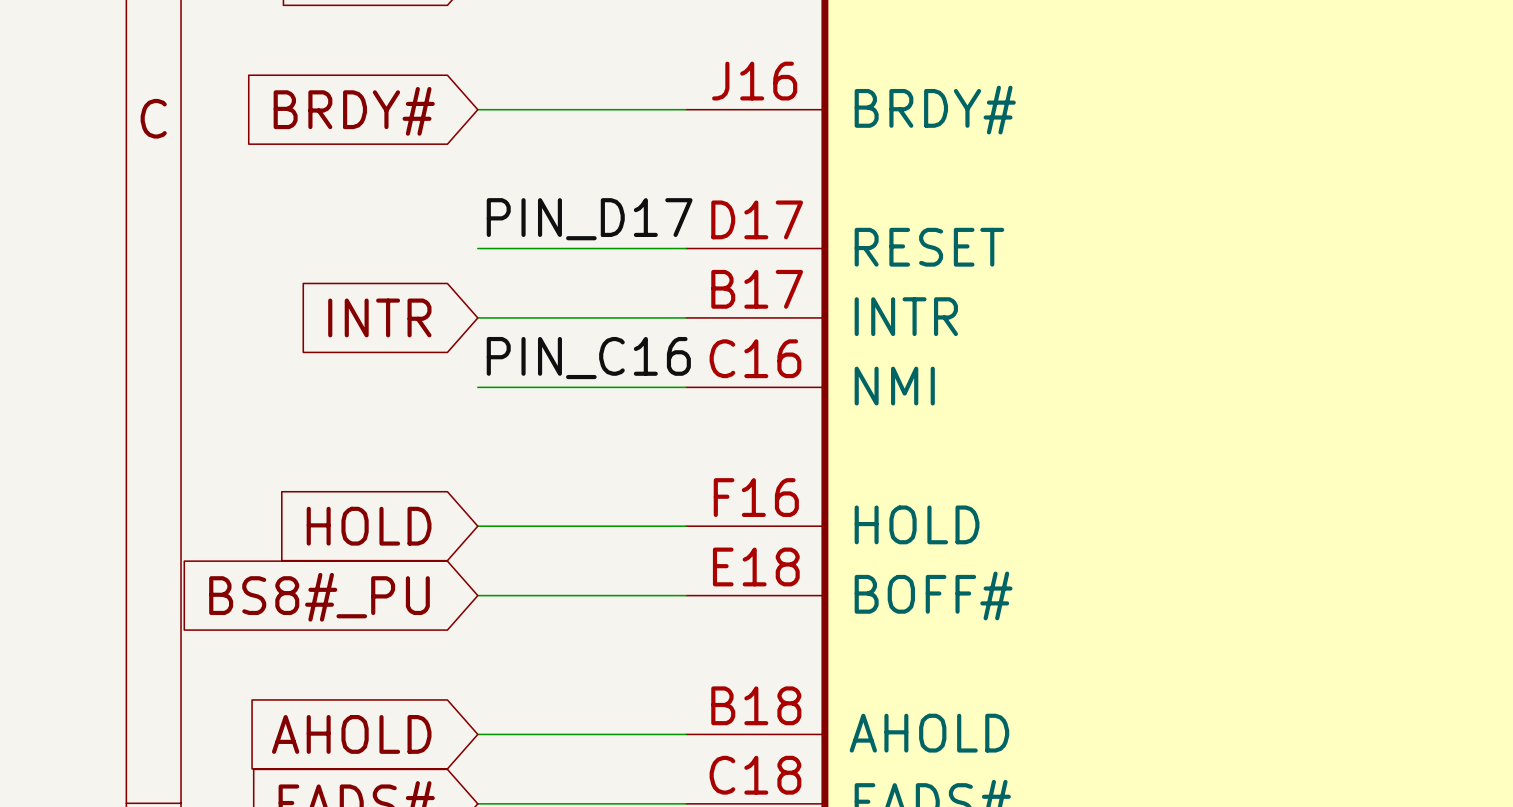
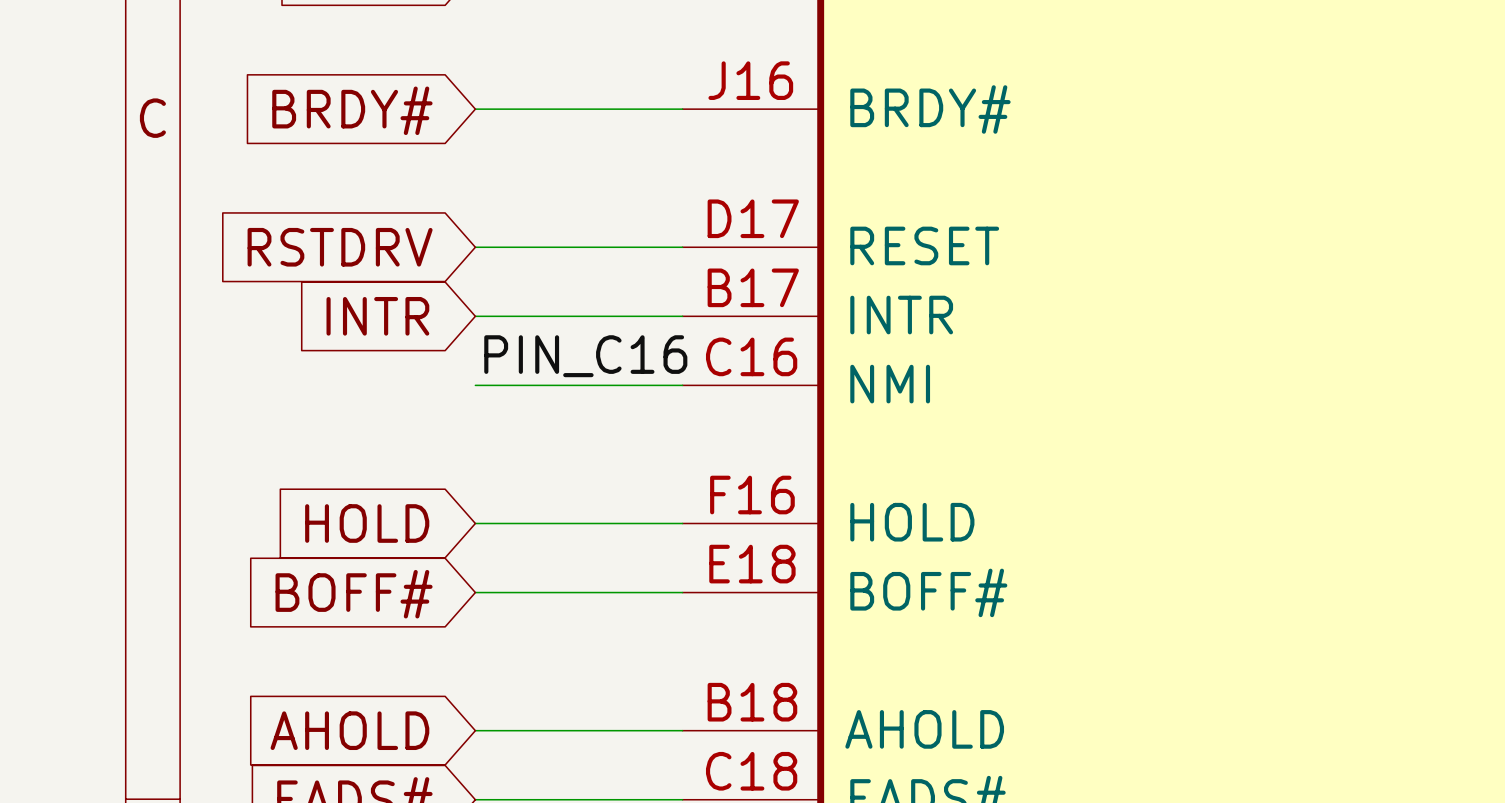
label: PIN_D17 (589, 219) -> none
global label: none -> RSTDRV (340, 247)
global label: BS8#_PU (319, 597) -> BOFF# (354, 594)

